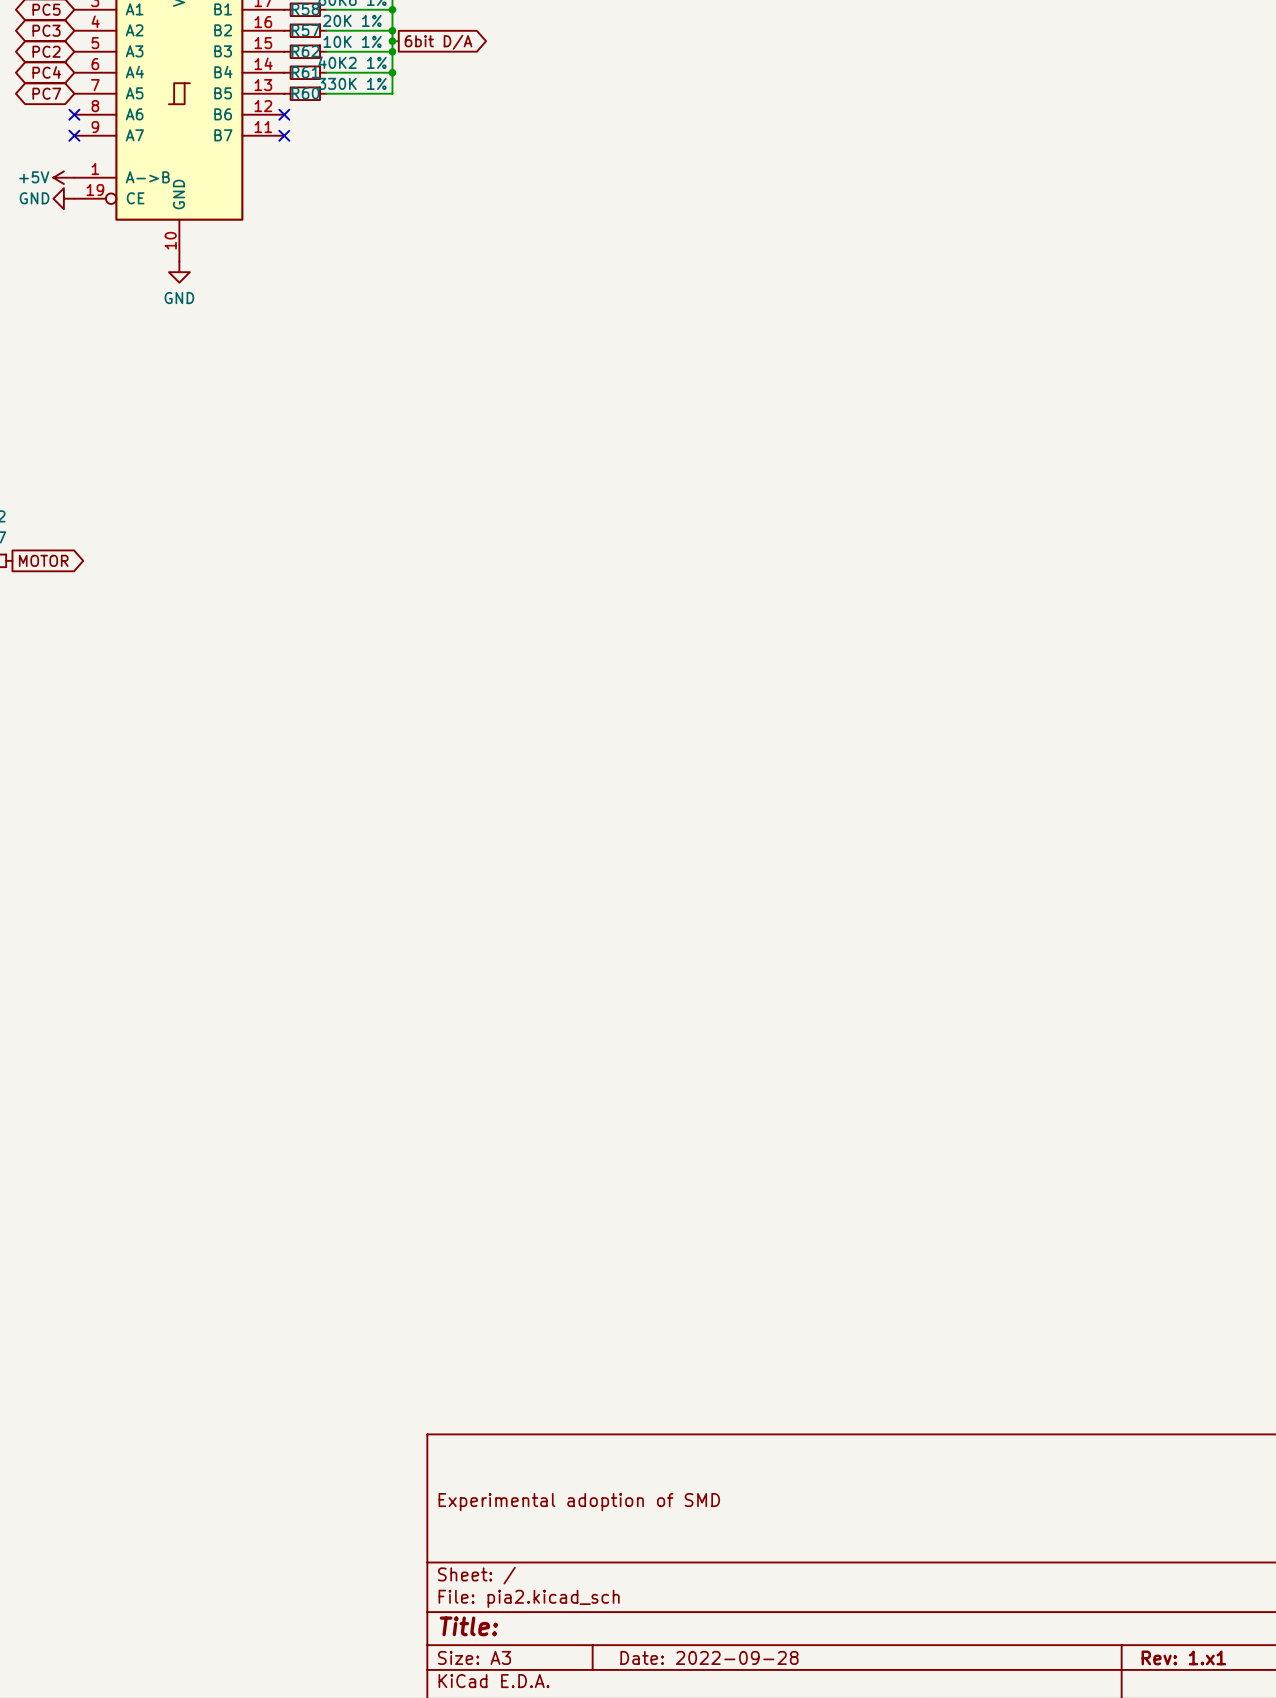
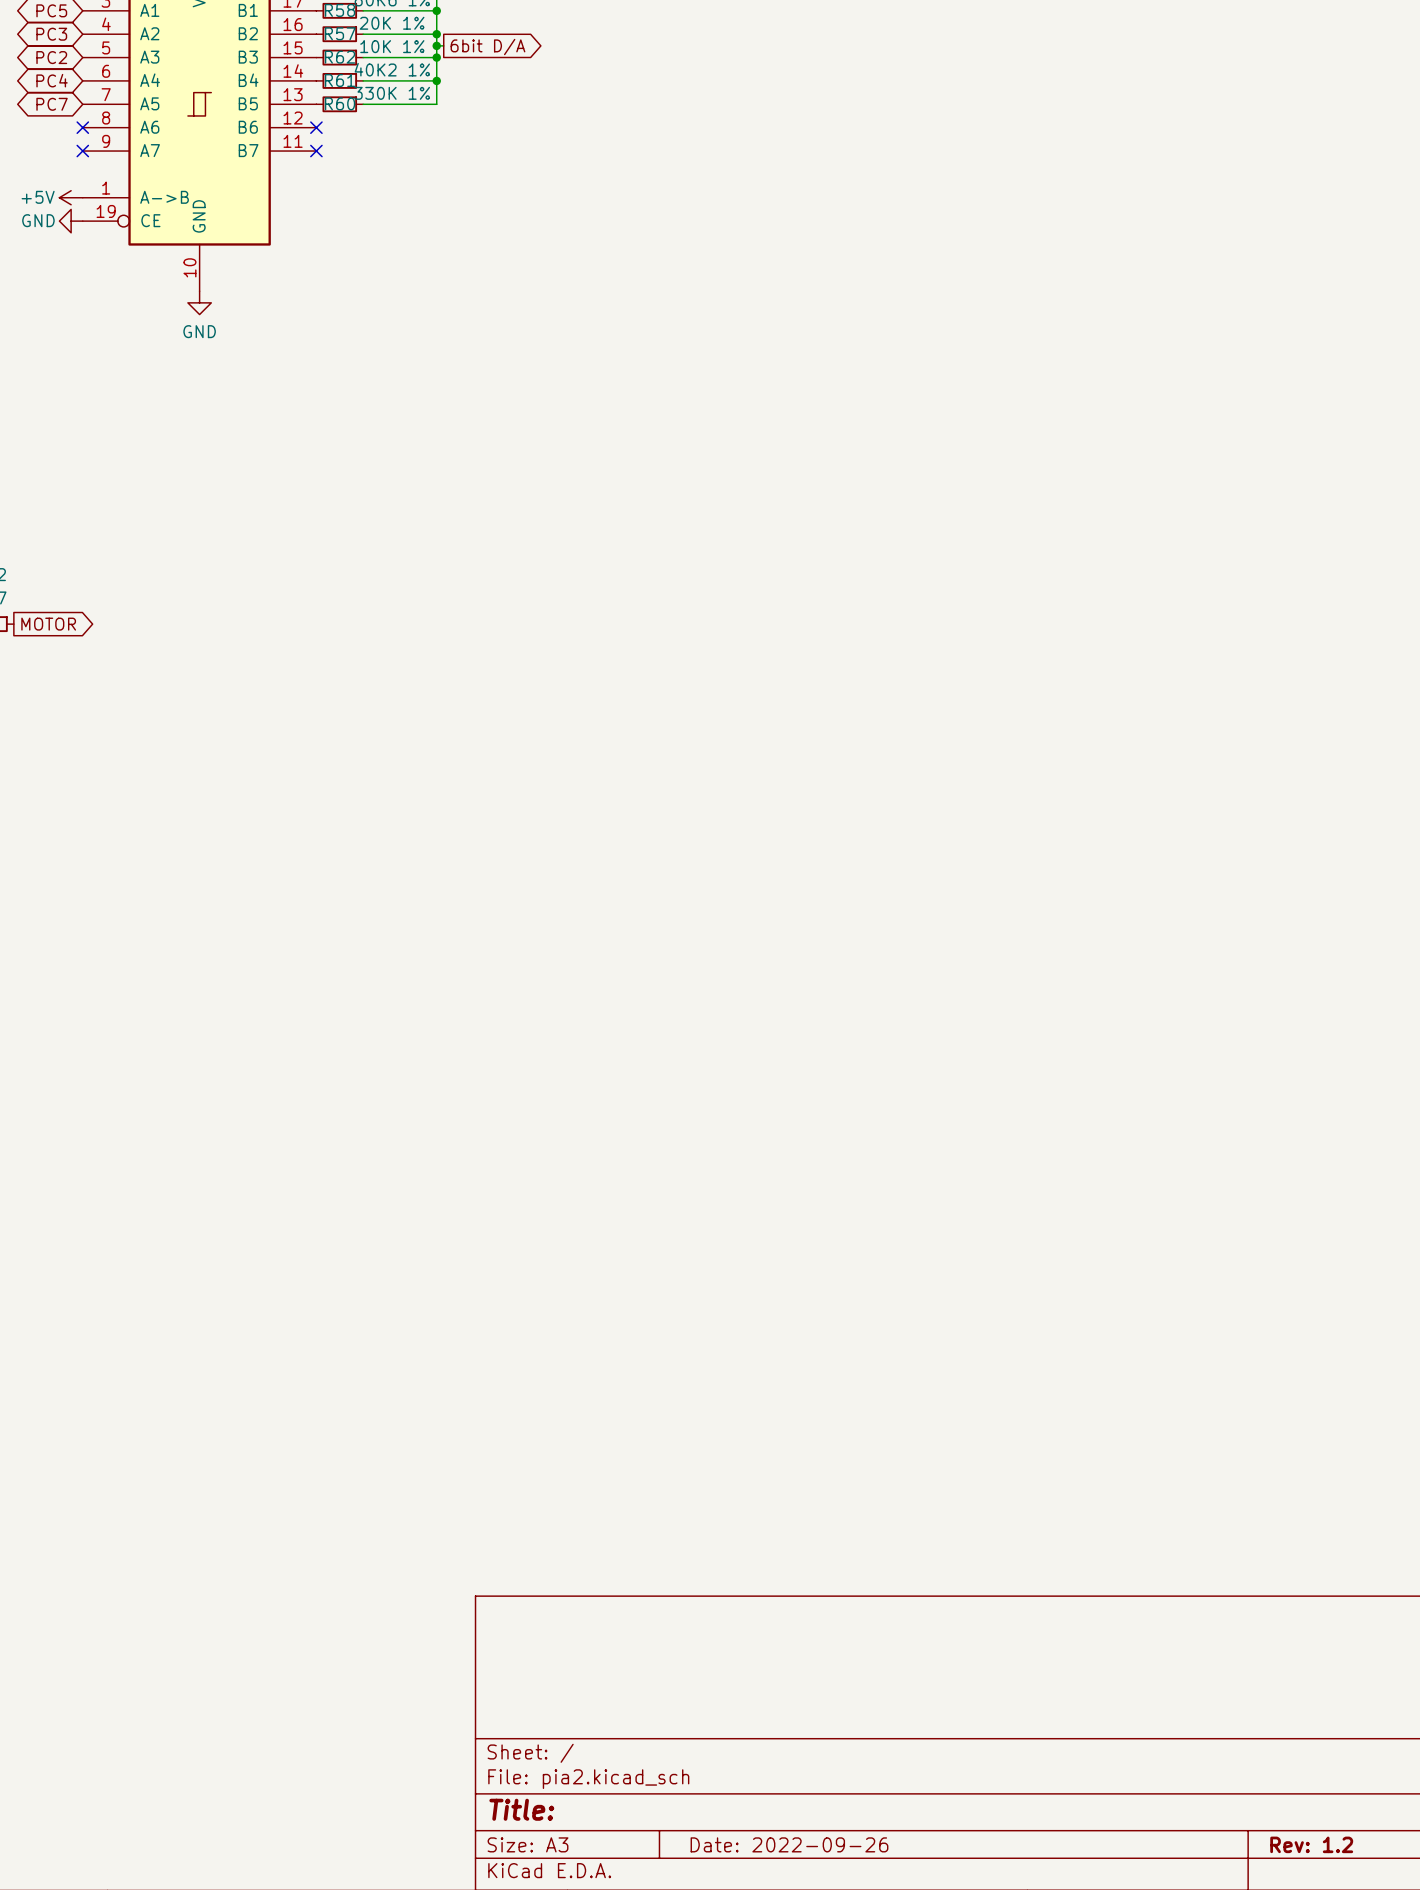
title block: Experimental adoption of SMD (579, 1502) -> none
title block: Date: 2022-09-28 (709, 1657) -> Date: 2022-09-26 (789, 1844)
title block: Rev: 1.x1 (1183, 1657) -> Rev: 1.2 (1311, 1844)

